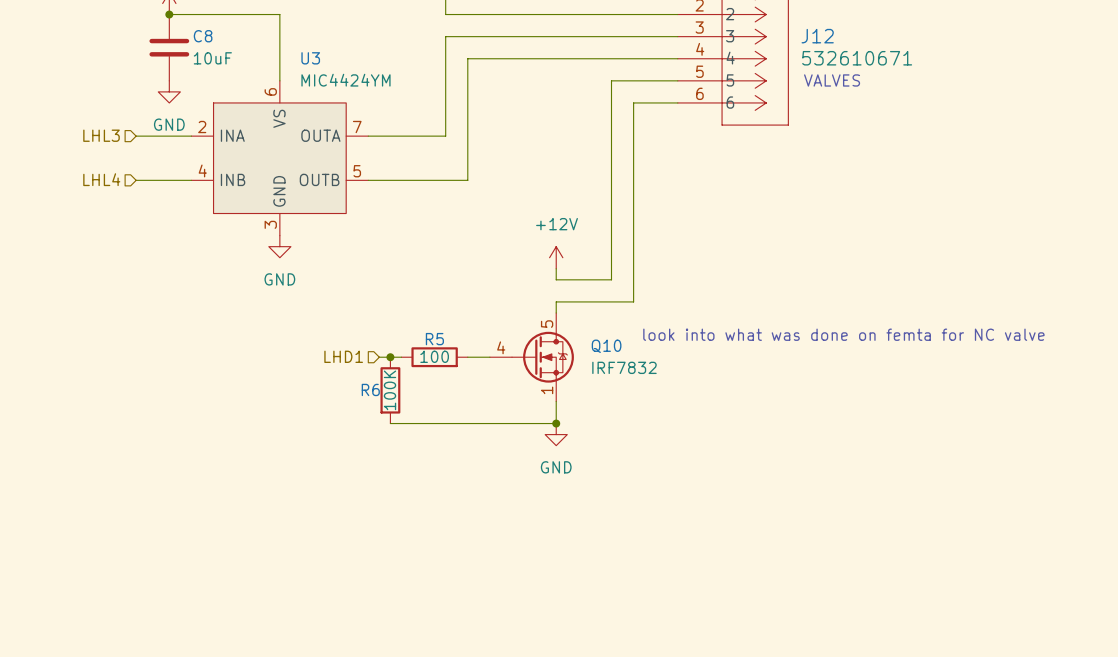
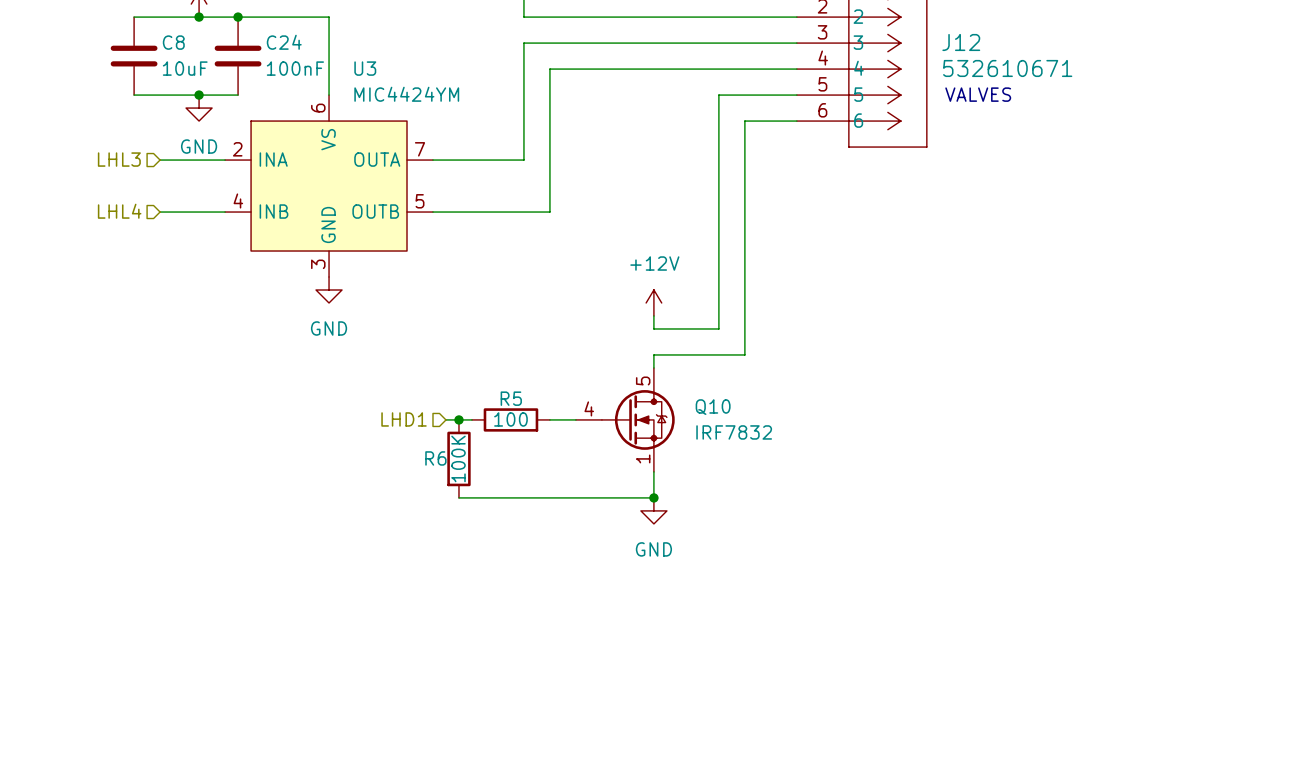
wire: none -> (134, 17) (199, 17)
junction: none -> (238, 17)
C8 position: (169, 47) -> (134, 56)
C24: none -> 100nF (238, 56)
wire: none -> (134, 95) (238, 95)
junction: none -> (199, 95)
text: look into what was done on femta for NC valve (843, 334) -> none

